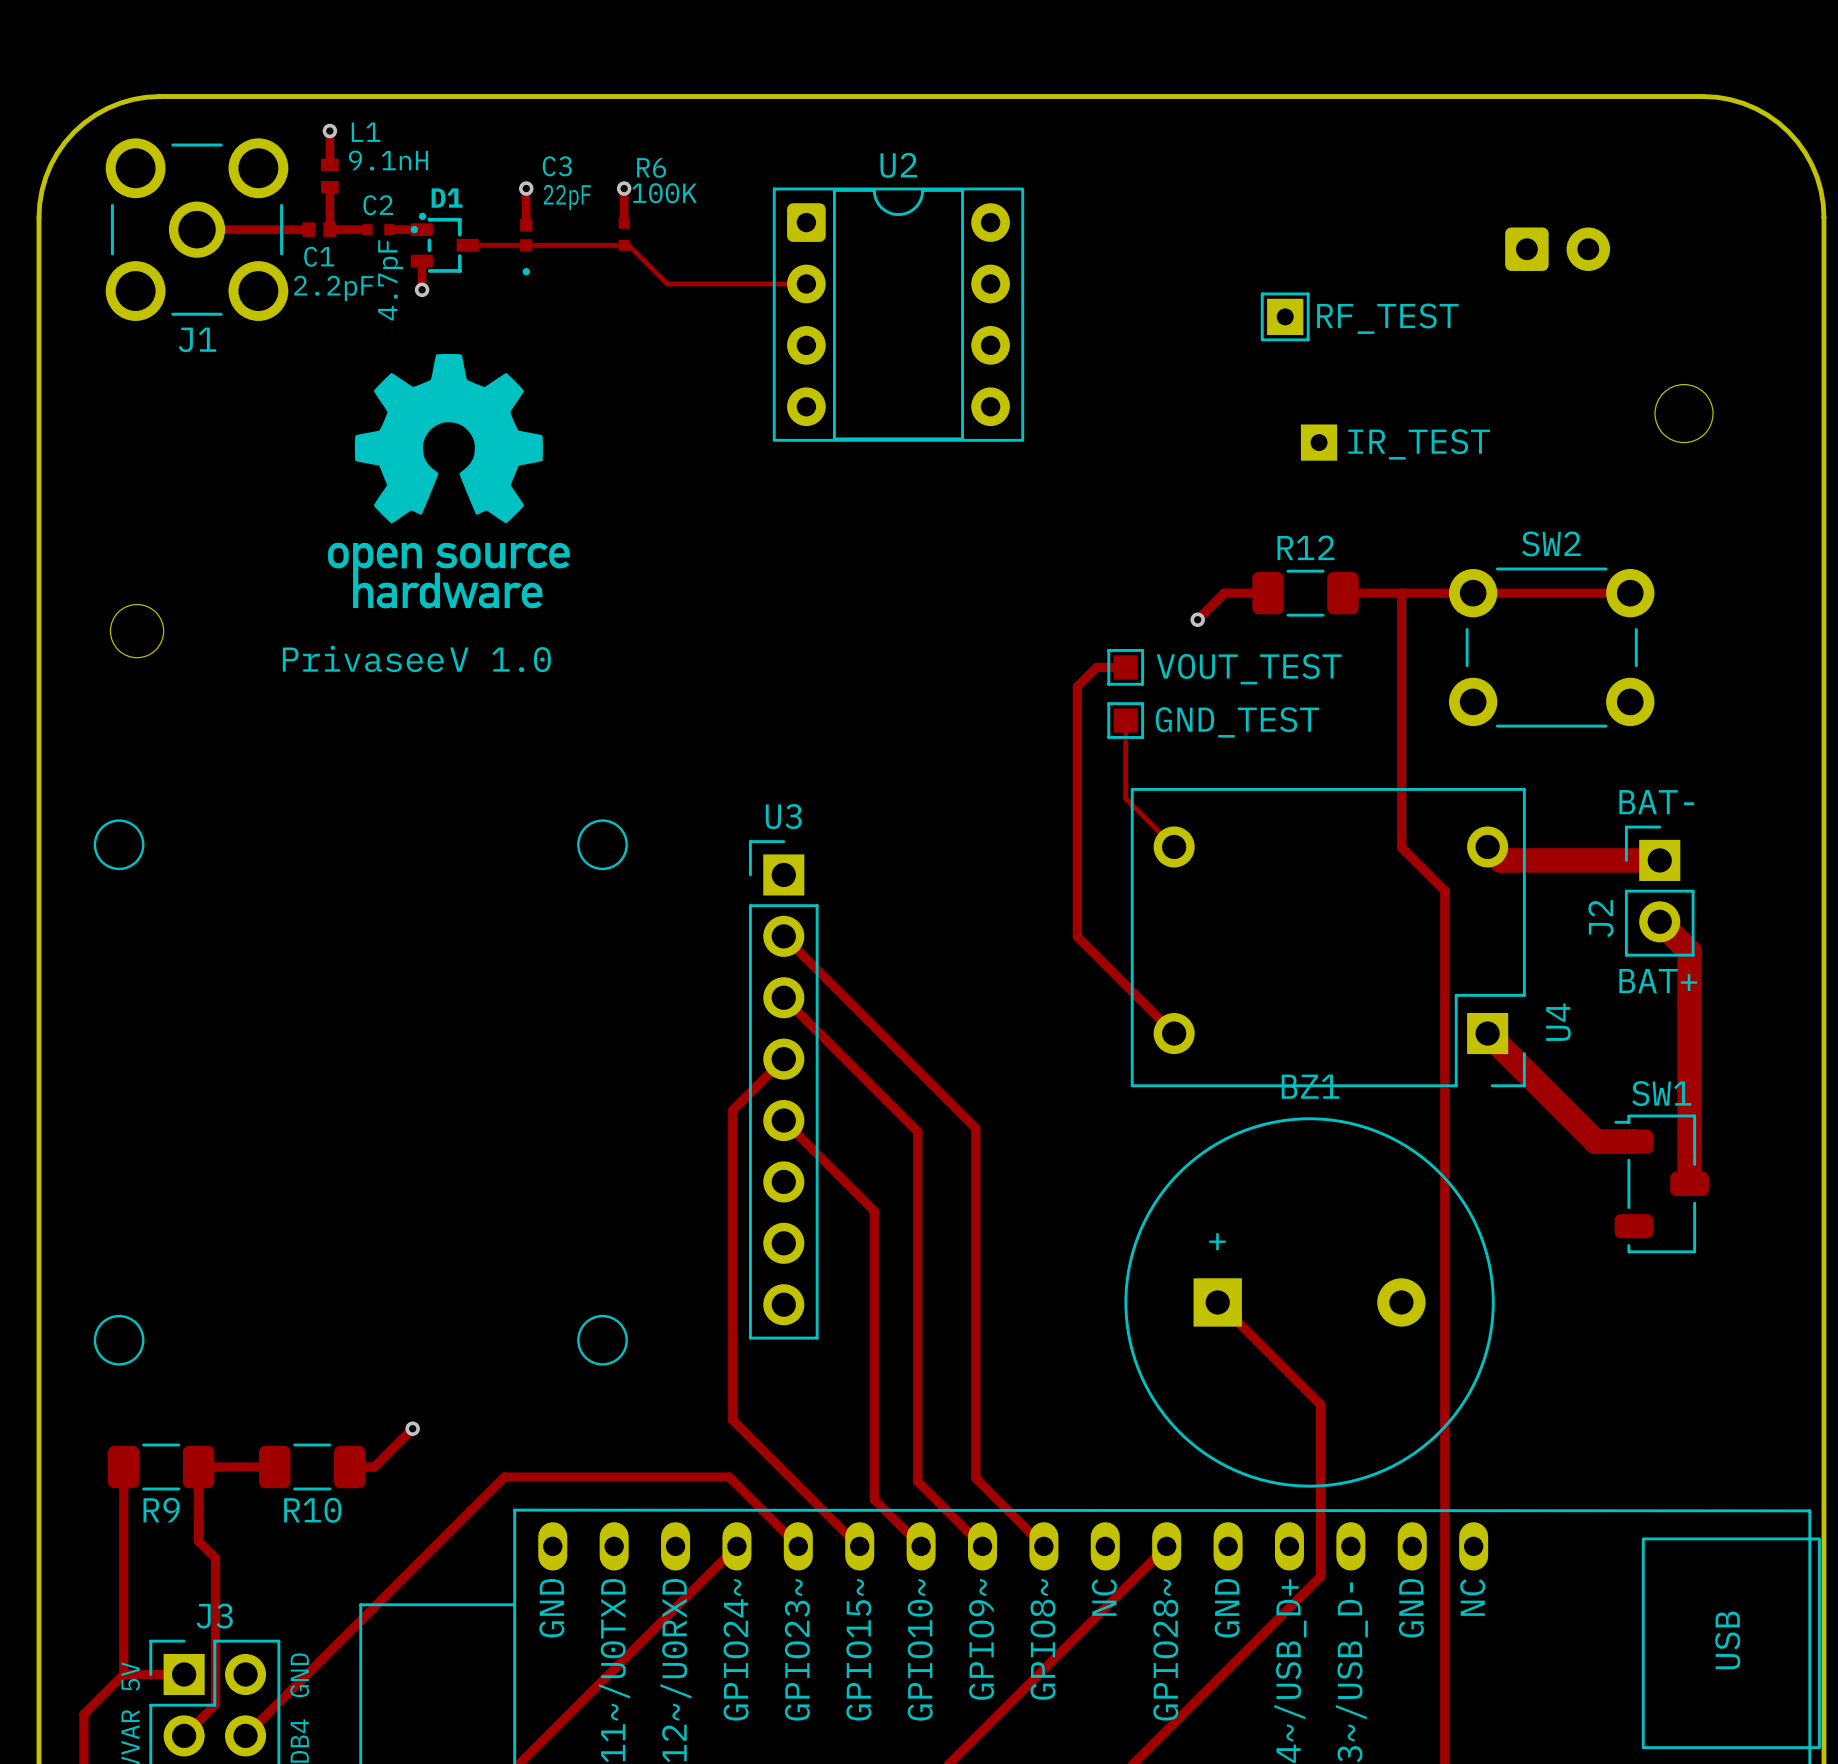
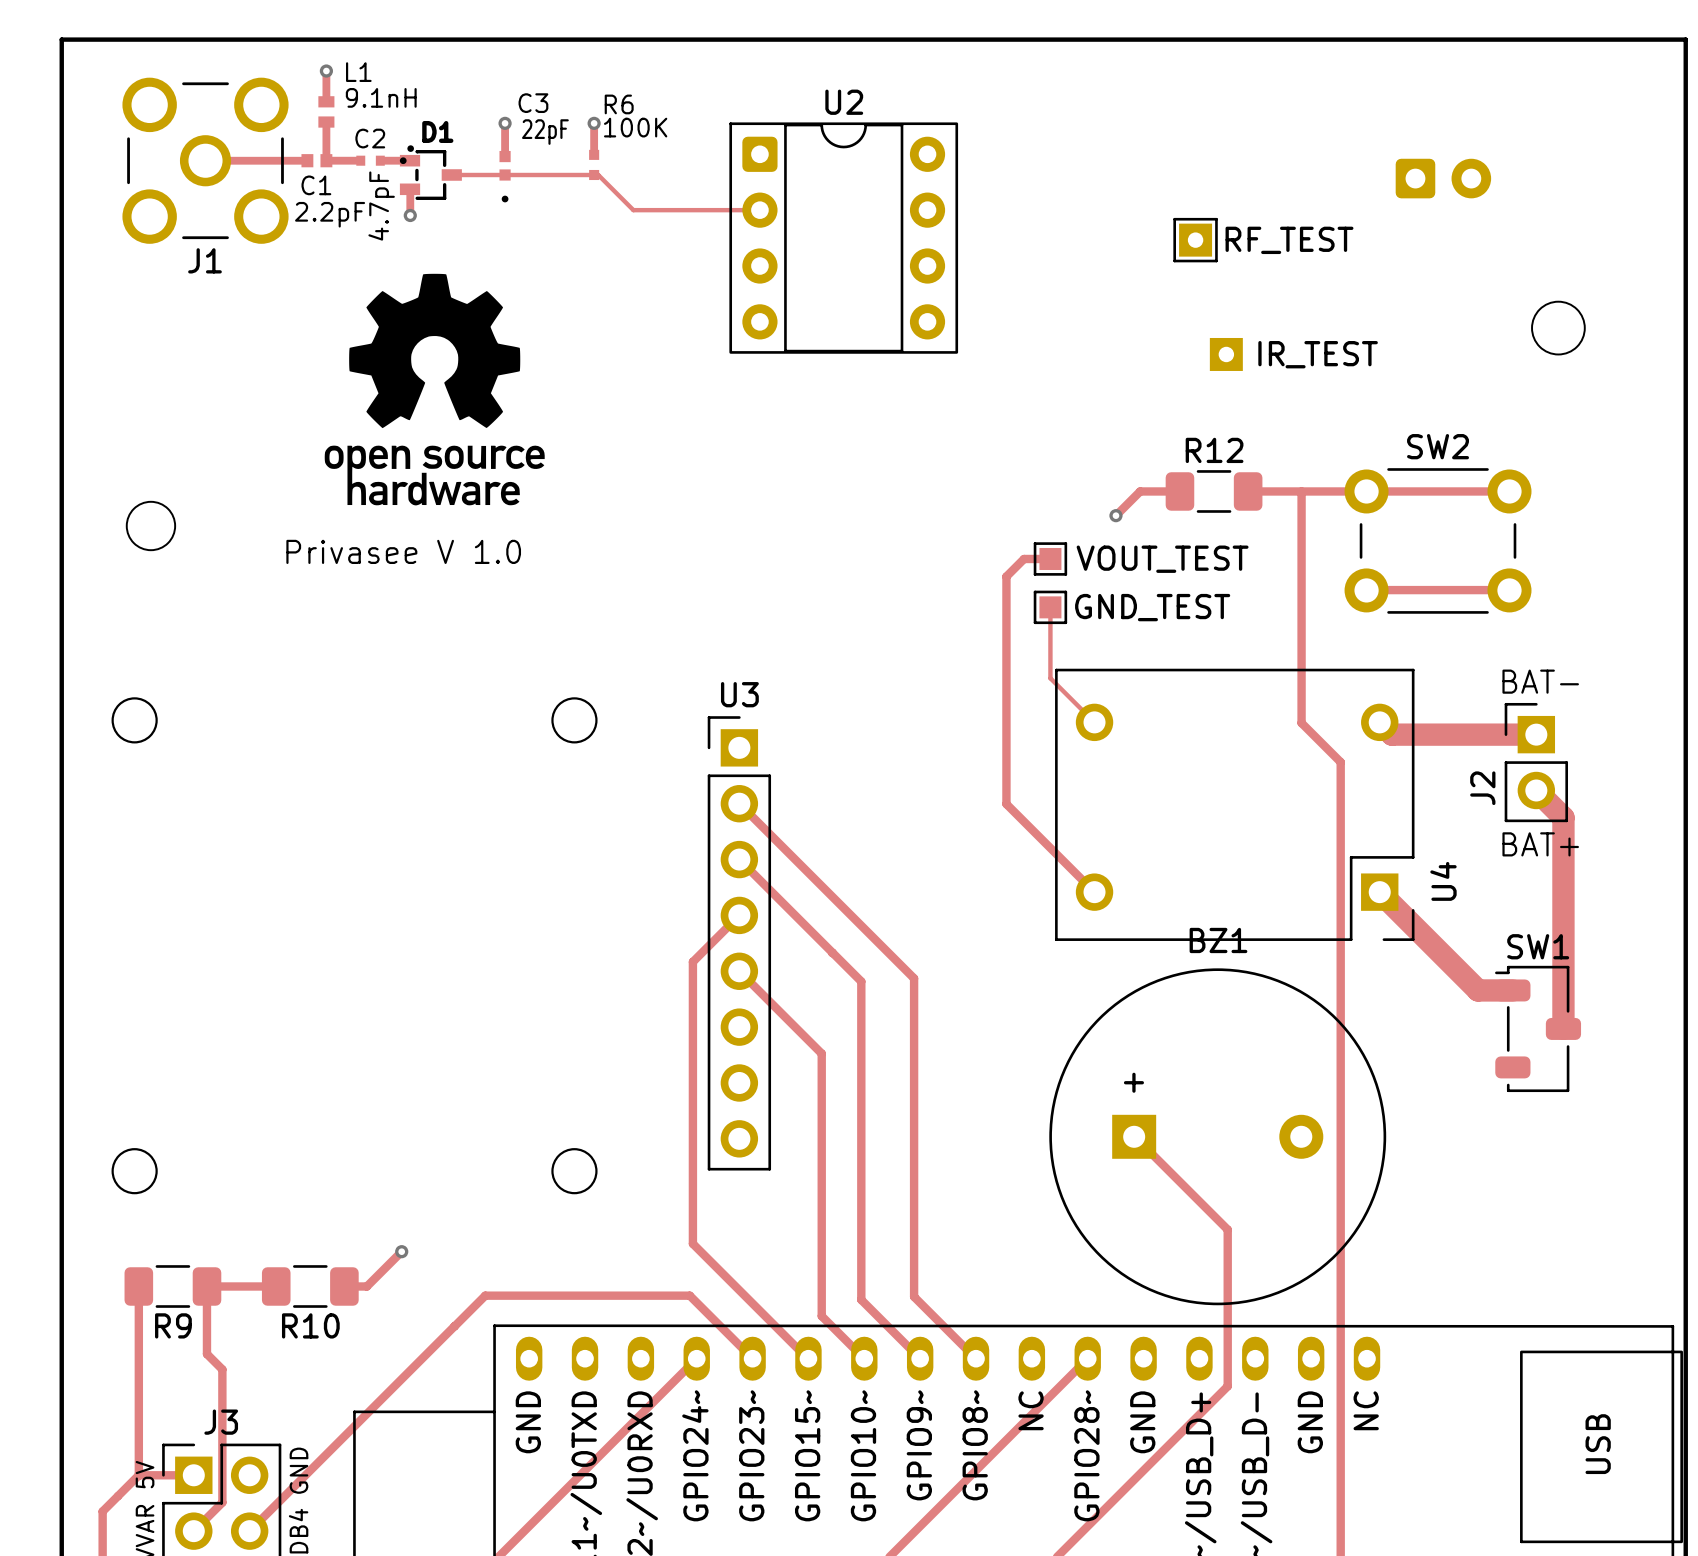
board edge: (159, 96) (146, 97) (119, 103) (95, 115) (74, 131) (57, 153) (45, 177) (42, 190) (38, 217) -> (171, 39) (61, 39) (61, 149)
board edge: (1703, 96) (1730, 99) (1755, 108) (1778, 122) (1788, 131) (1805, 153) (1817, 177) (1823, 203) (1823, 217) -> (1575, 39) (1685, 39) (1685, 149)
track: none -> (1366, 590) (1509, 590)

